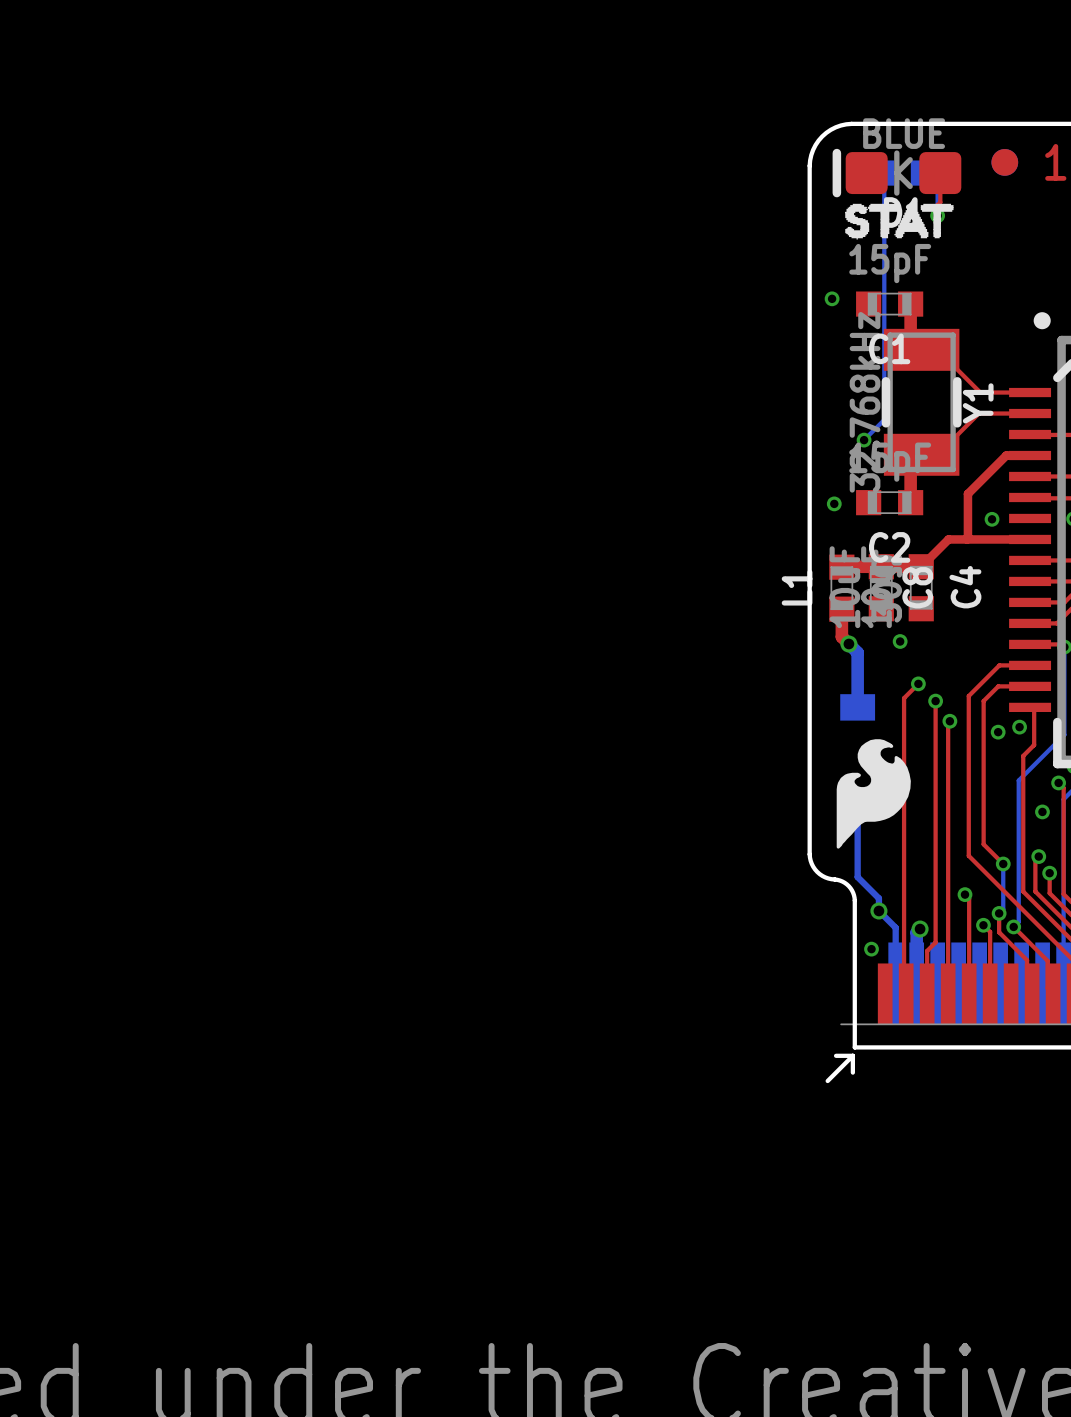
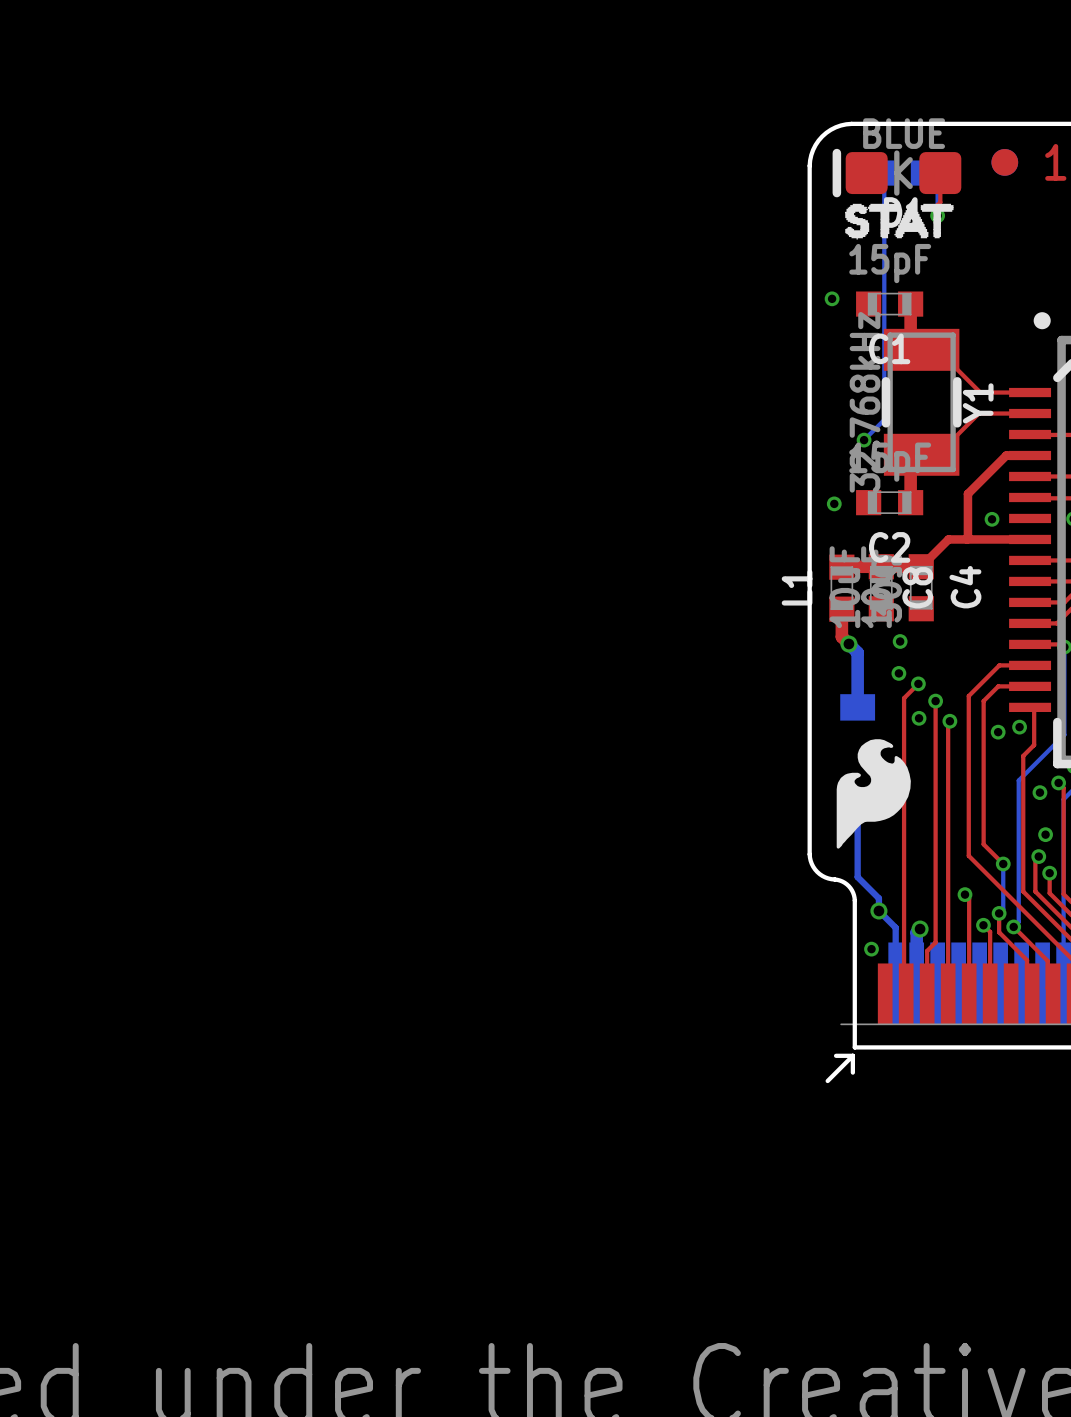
via: none -> (898, 673)
via: none -> (919, 718)
via: none -> (1039, 792)
via: (1042, 811) -> none
via: none -> (1045, 834)

